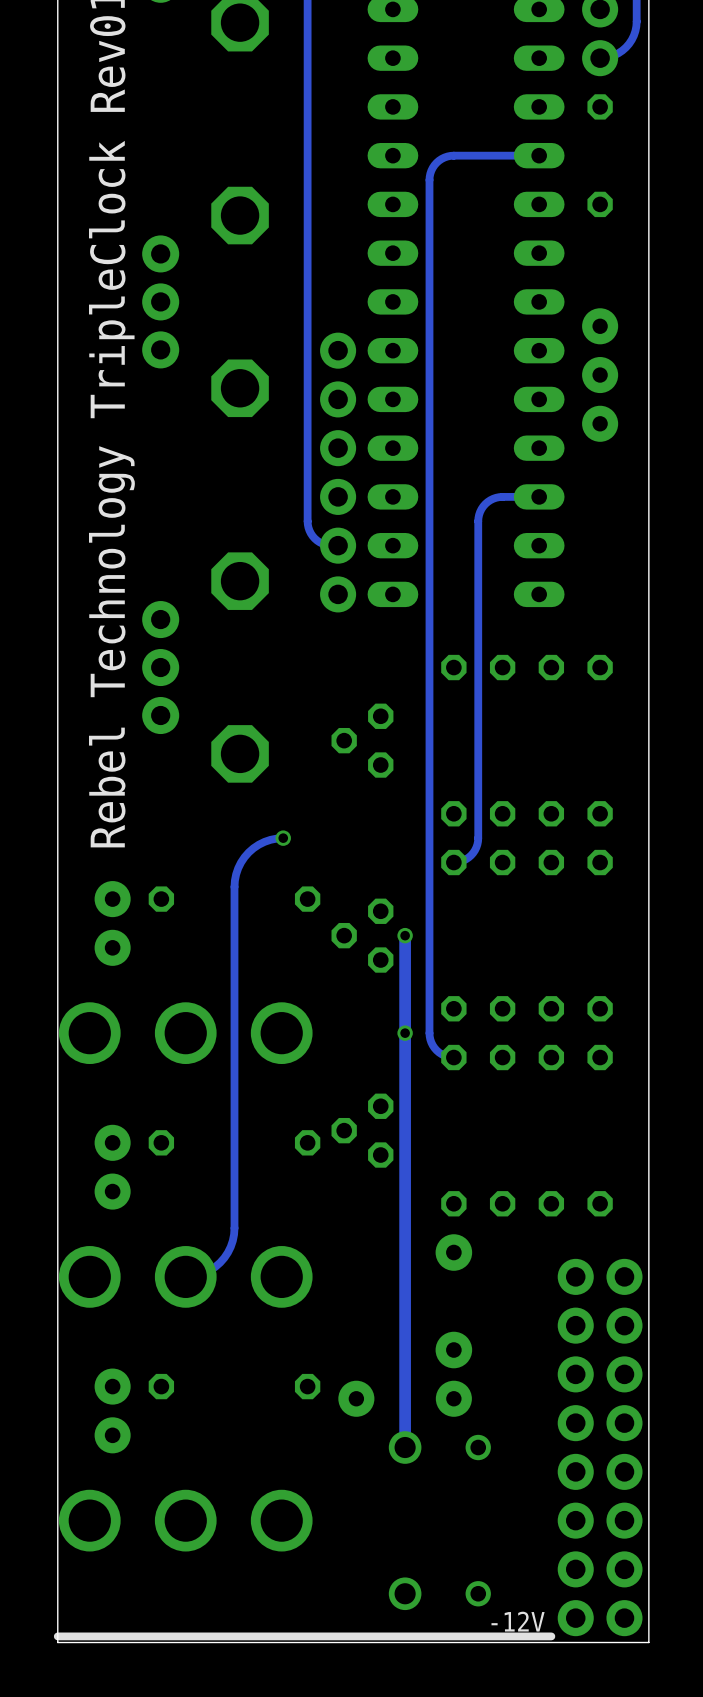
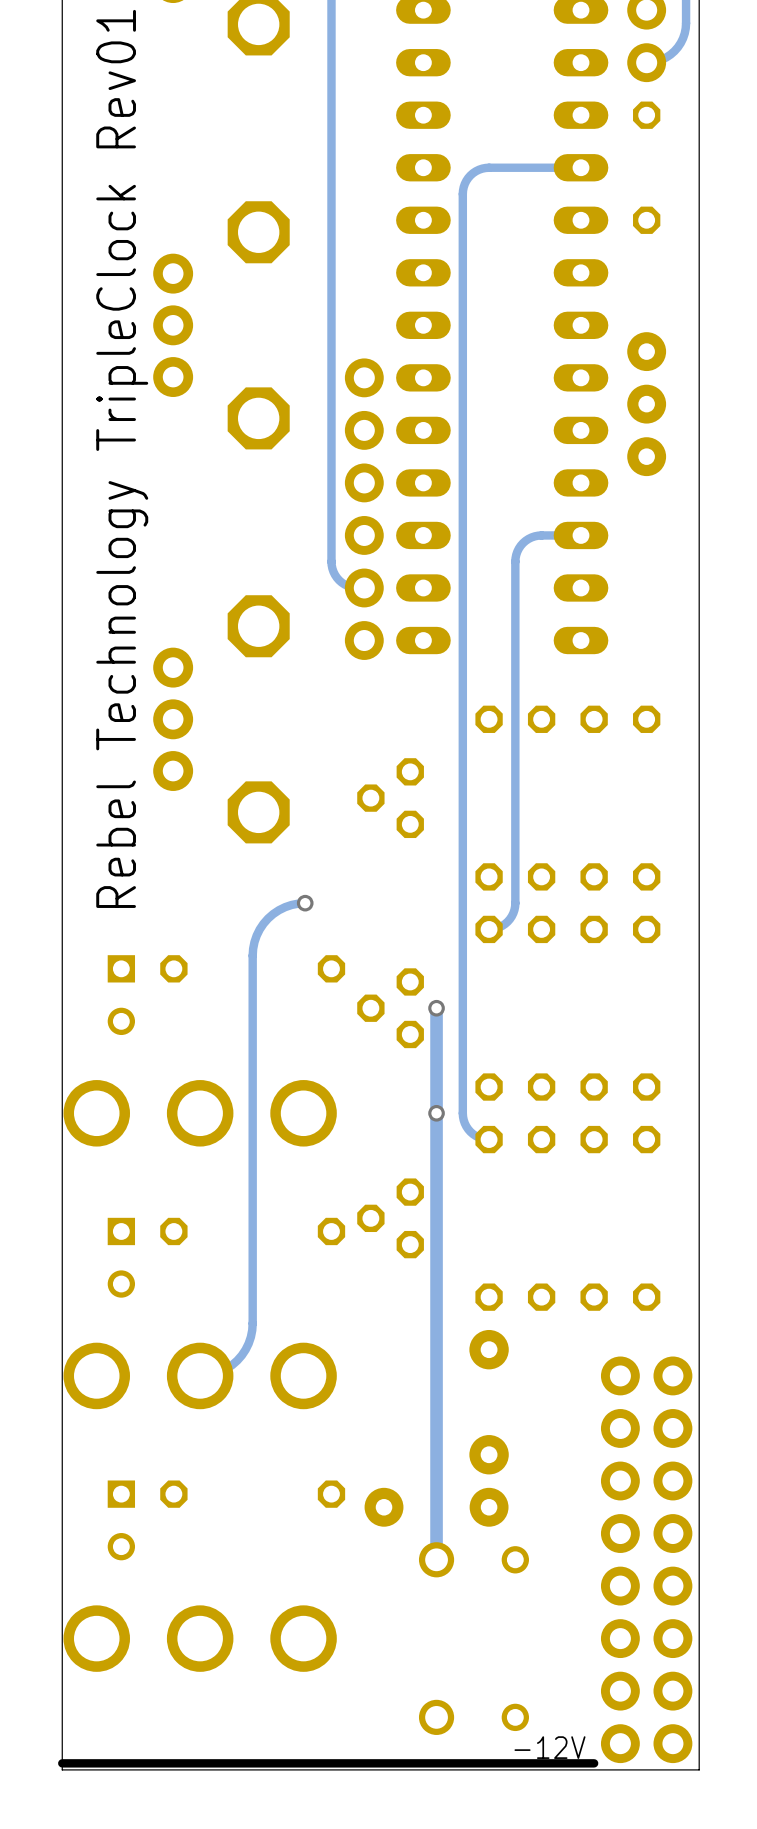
part footprint: [94, 881, 131, 966] -> [107, 955, 136, 1036]
part footprint: [94, 1124, 131, 1210] -> [107, 1217, 136, 1298]
part footprint: [94, 1368, 131, 1454] -> [107, 1480, 136, 1561]

